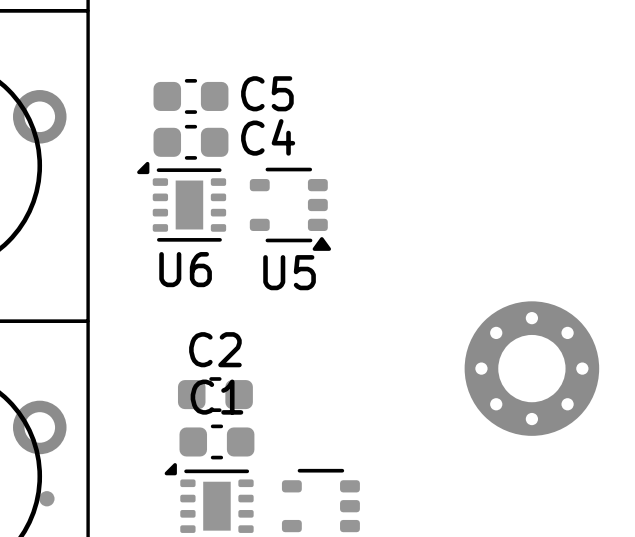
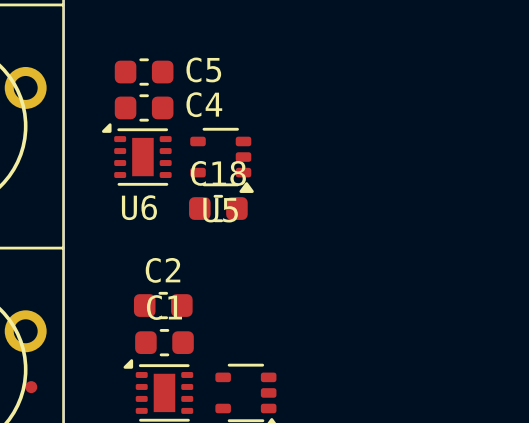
C18: none -> (218, 208)
part: (531, 368) -> none

